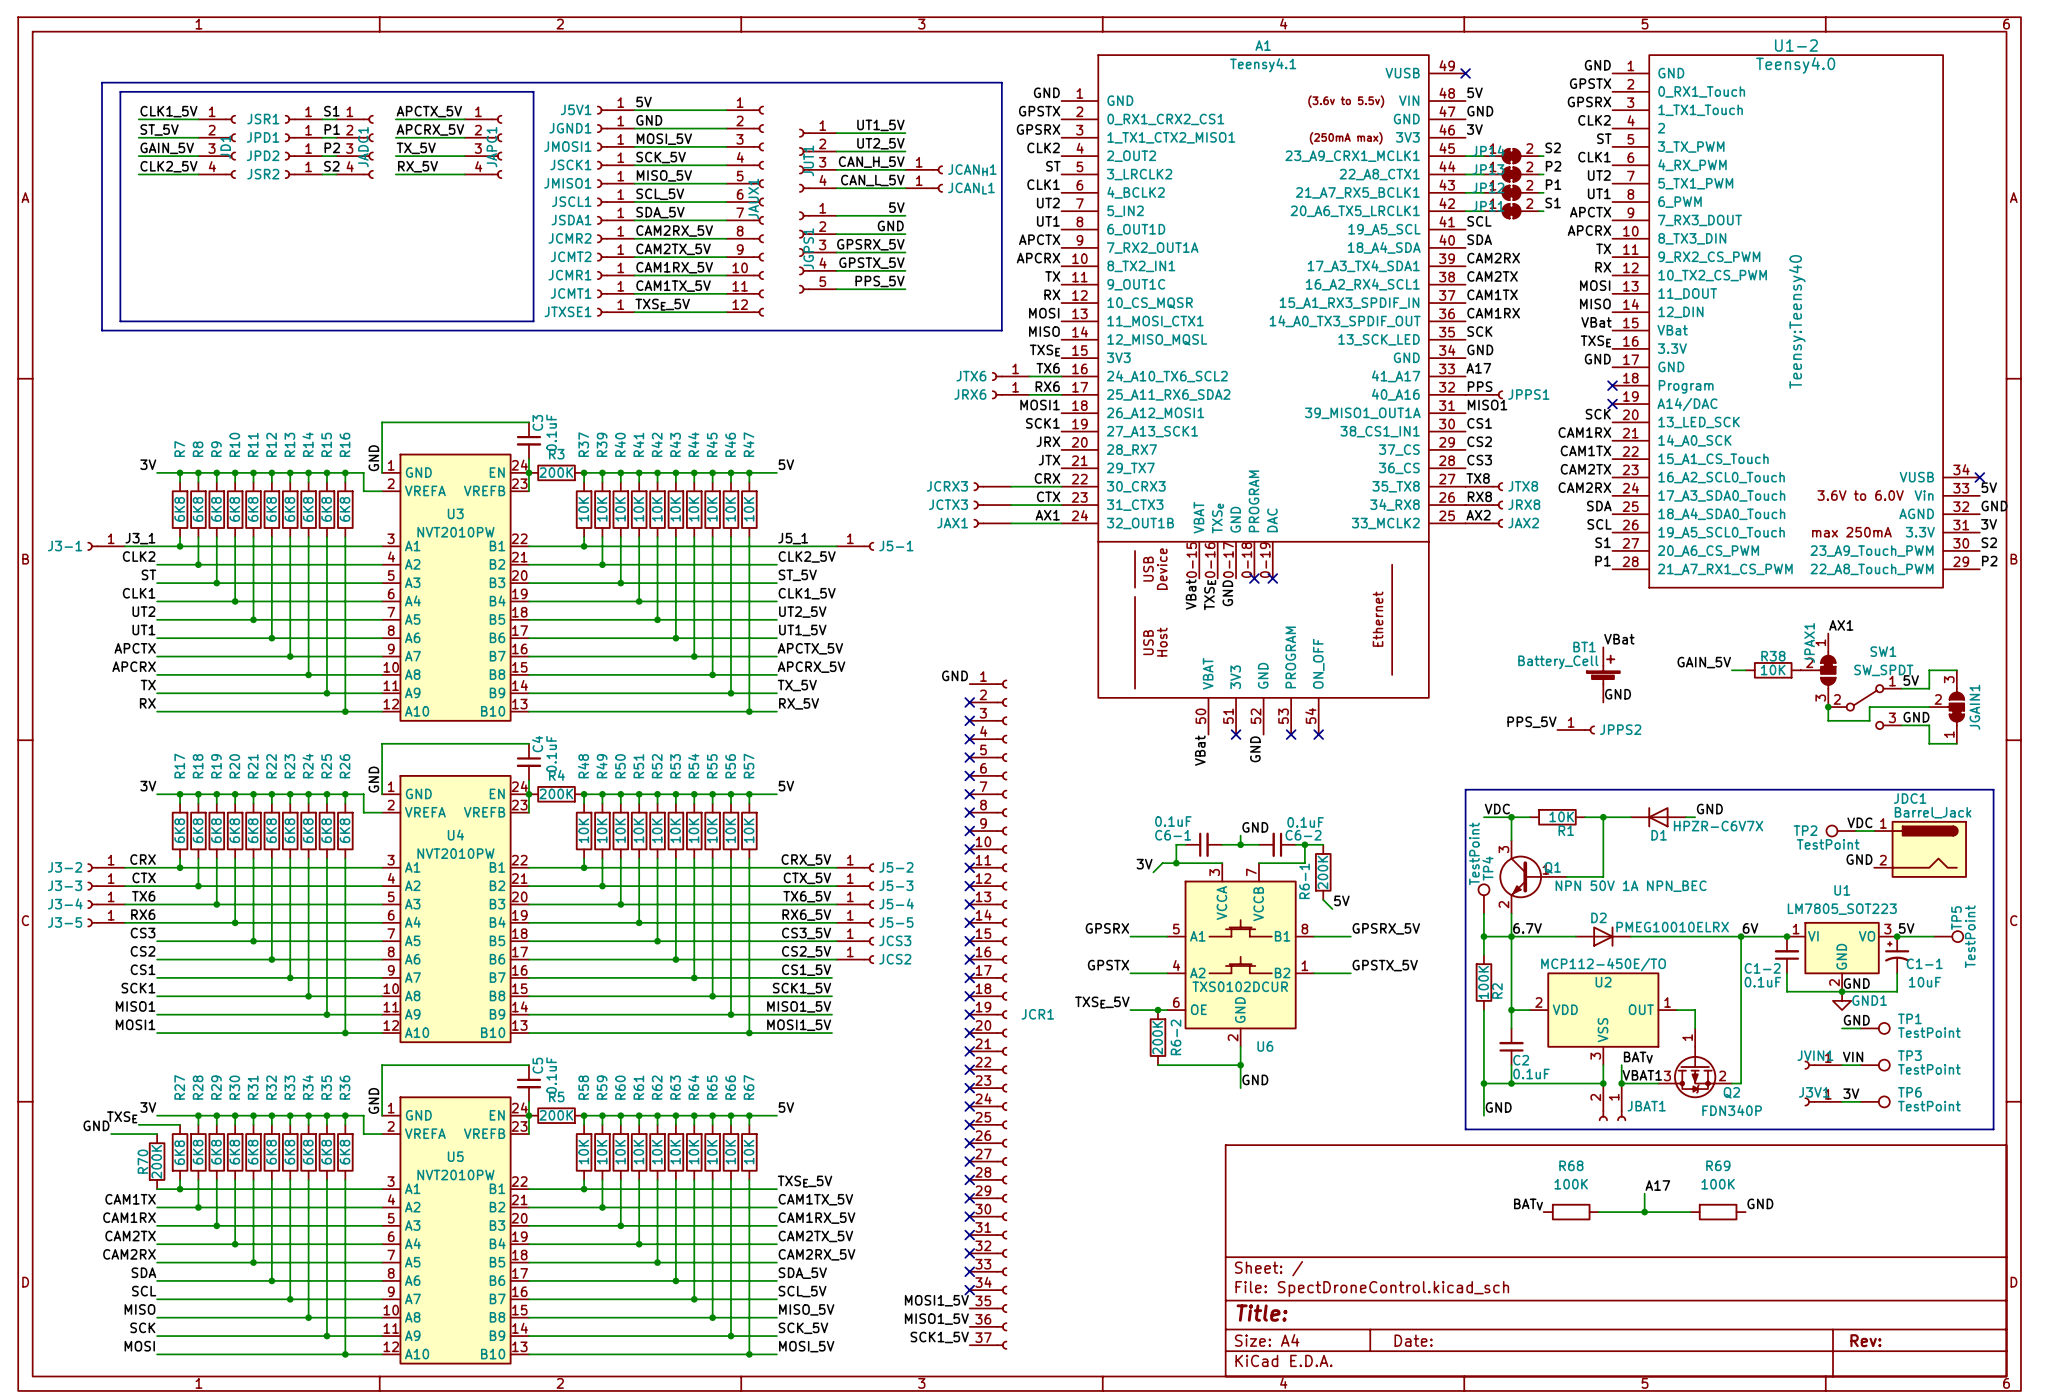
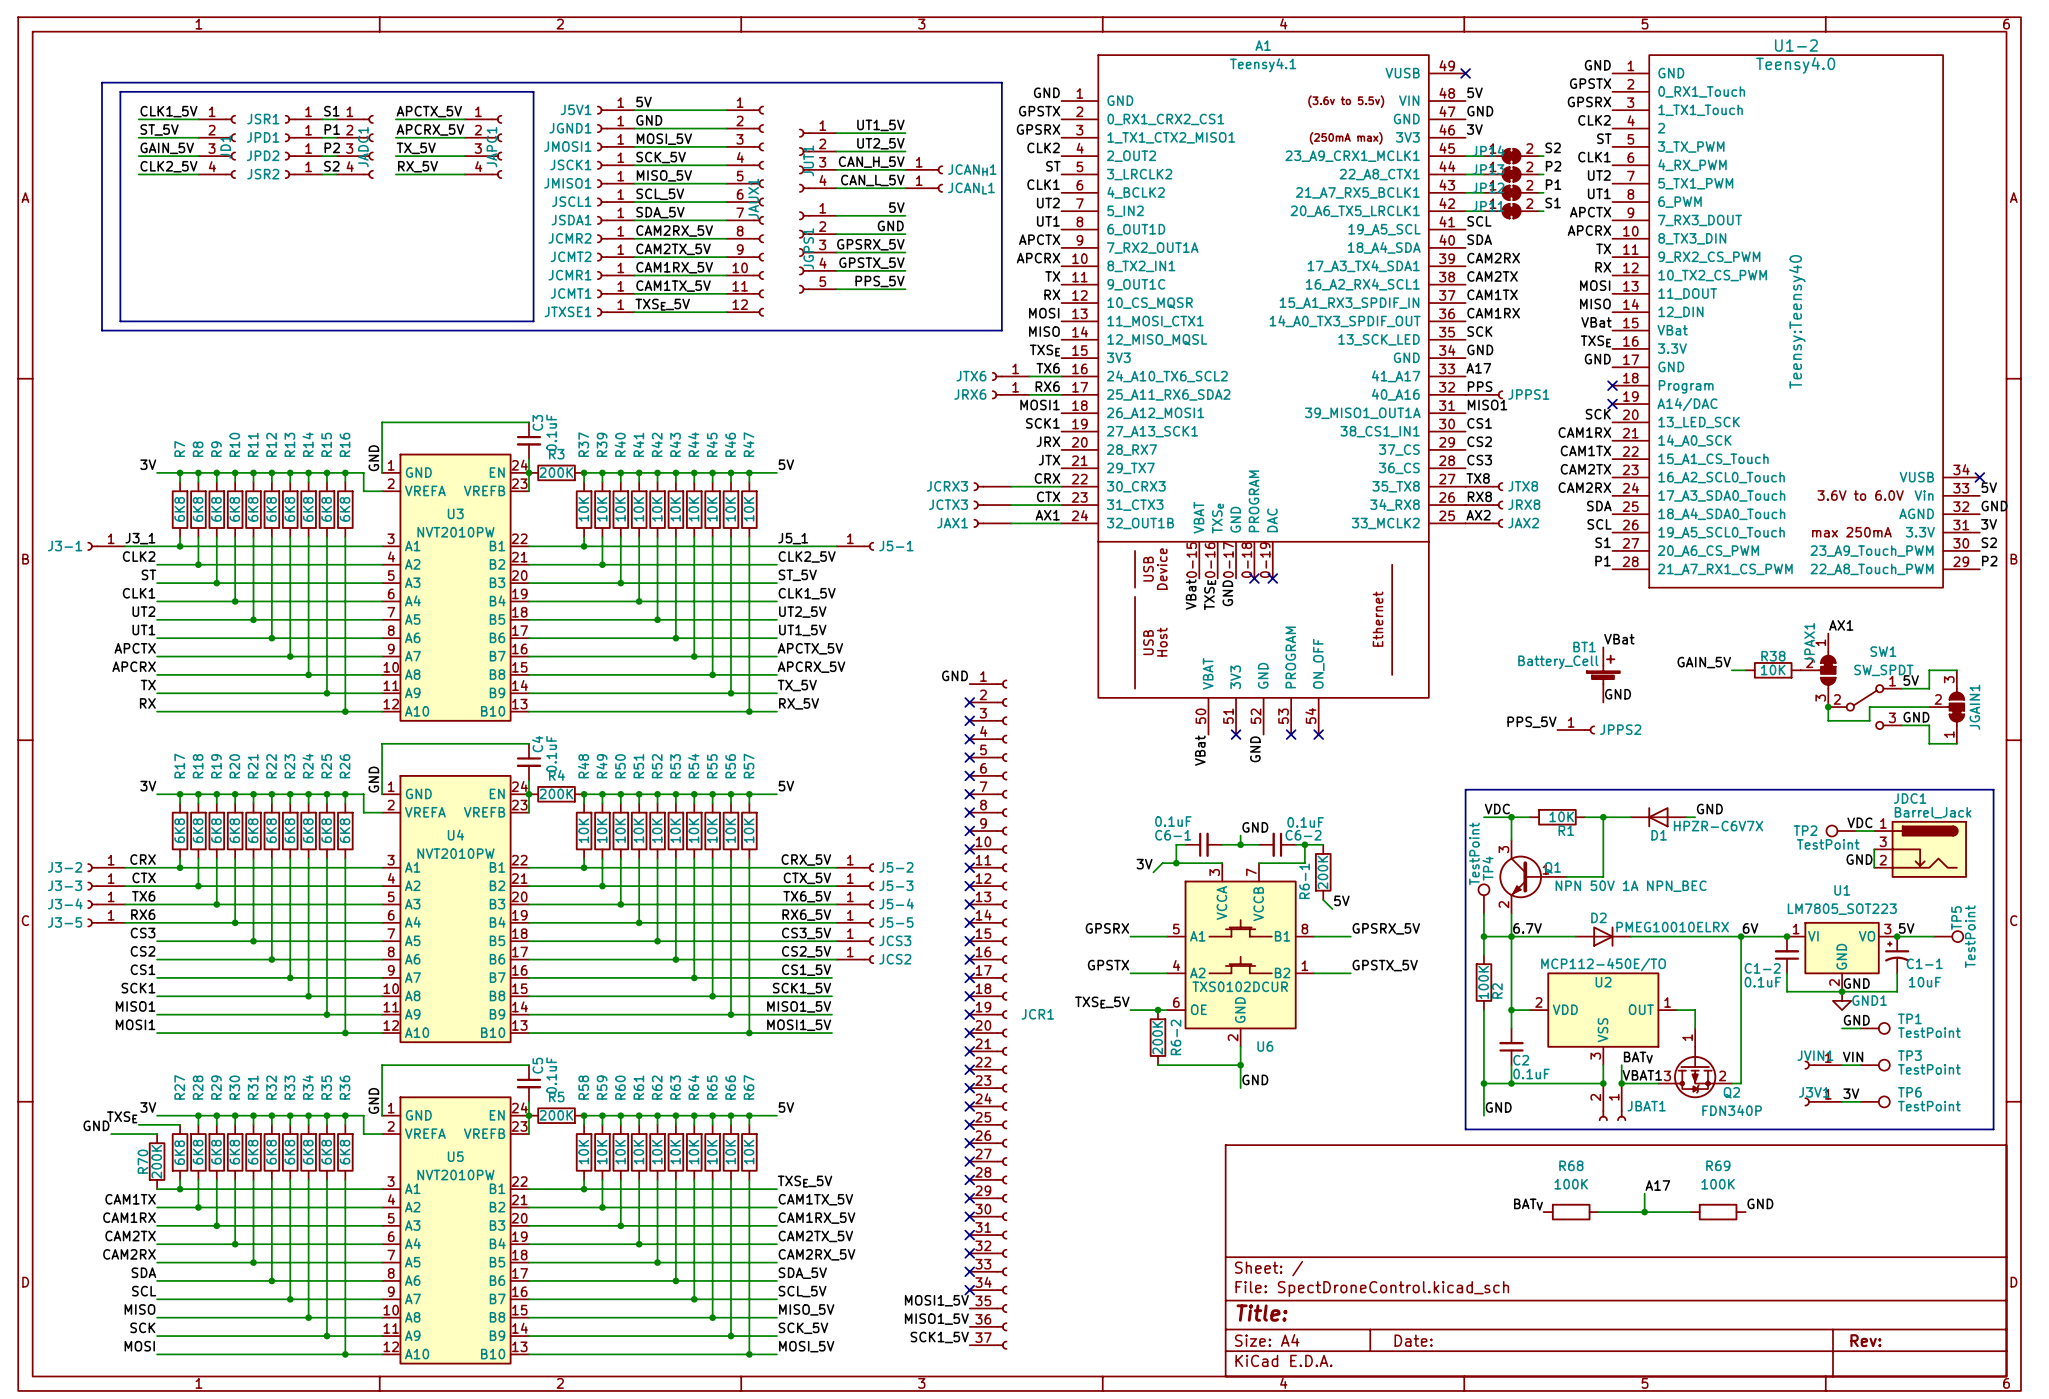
JDC1 symbol: [1874, 820, 1967, 878] -> [1874, 820, 1967, 878]
wire: none -> (1874, 849) (1874, 867)

